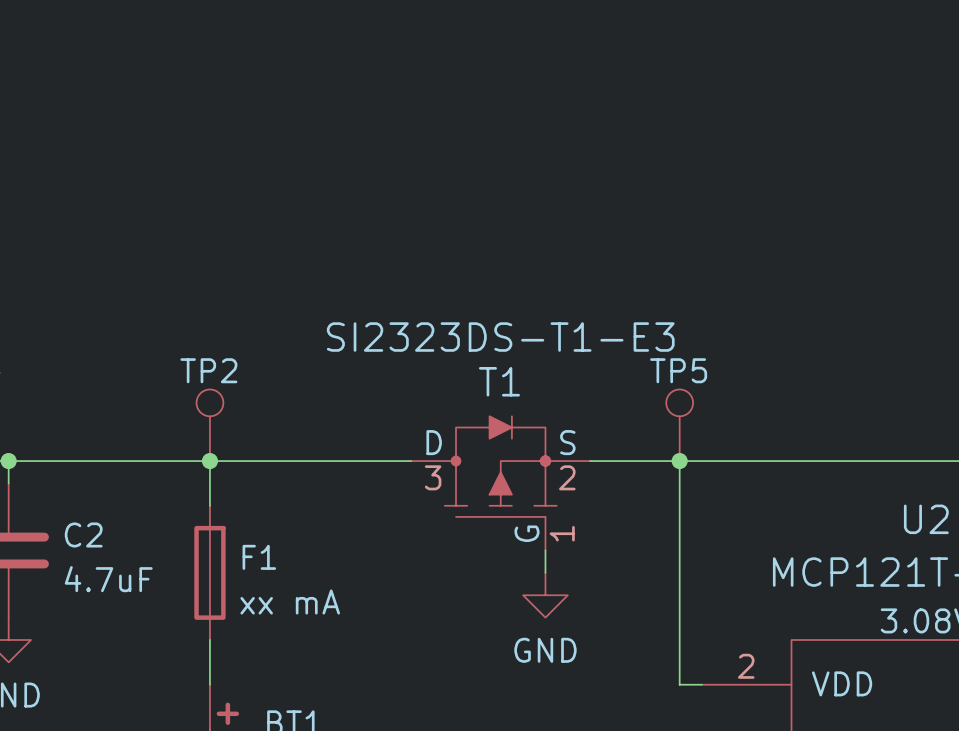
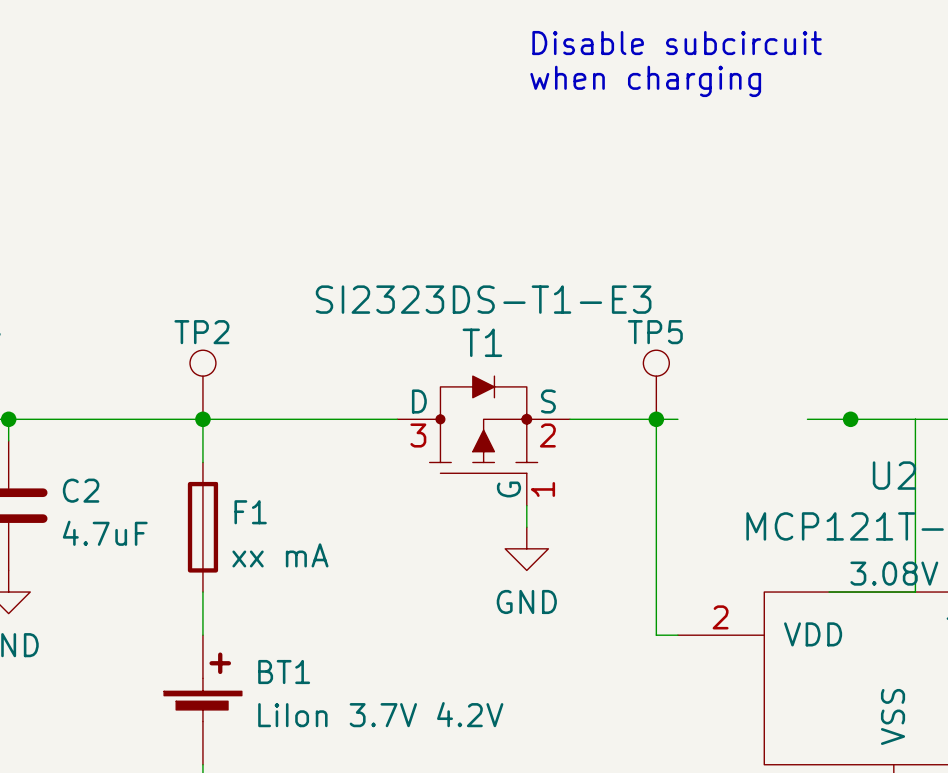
text: none -> Disable subcircuit (677, 43)
text: none -> when charging (645, 81)
wire: (702, 461) (836, 461) -> none
junction: none -> (850, 419)
wire: none -> (915, 419) (915, 592) (829, 592)

